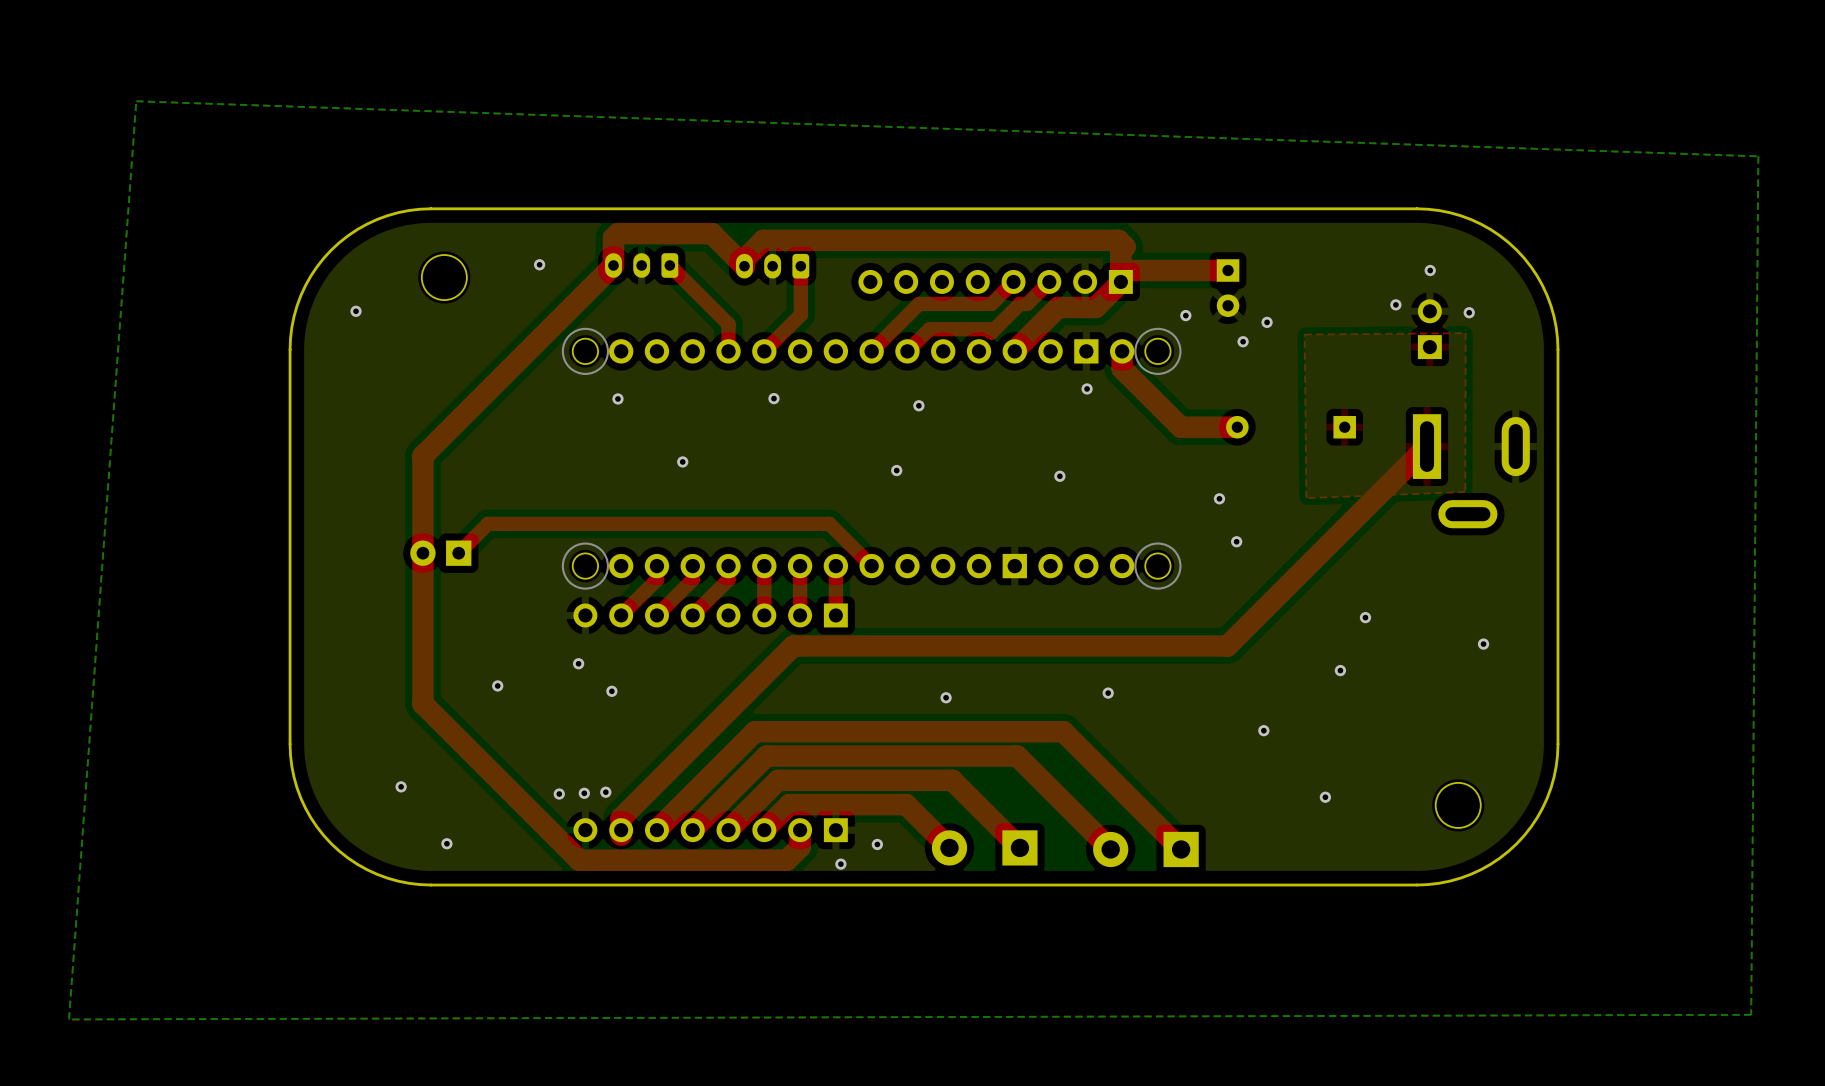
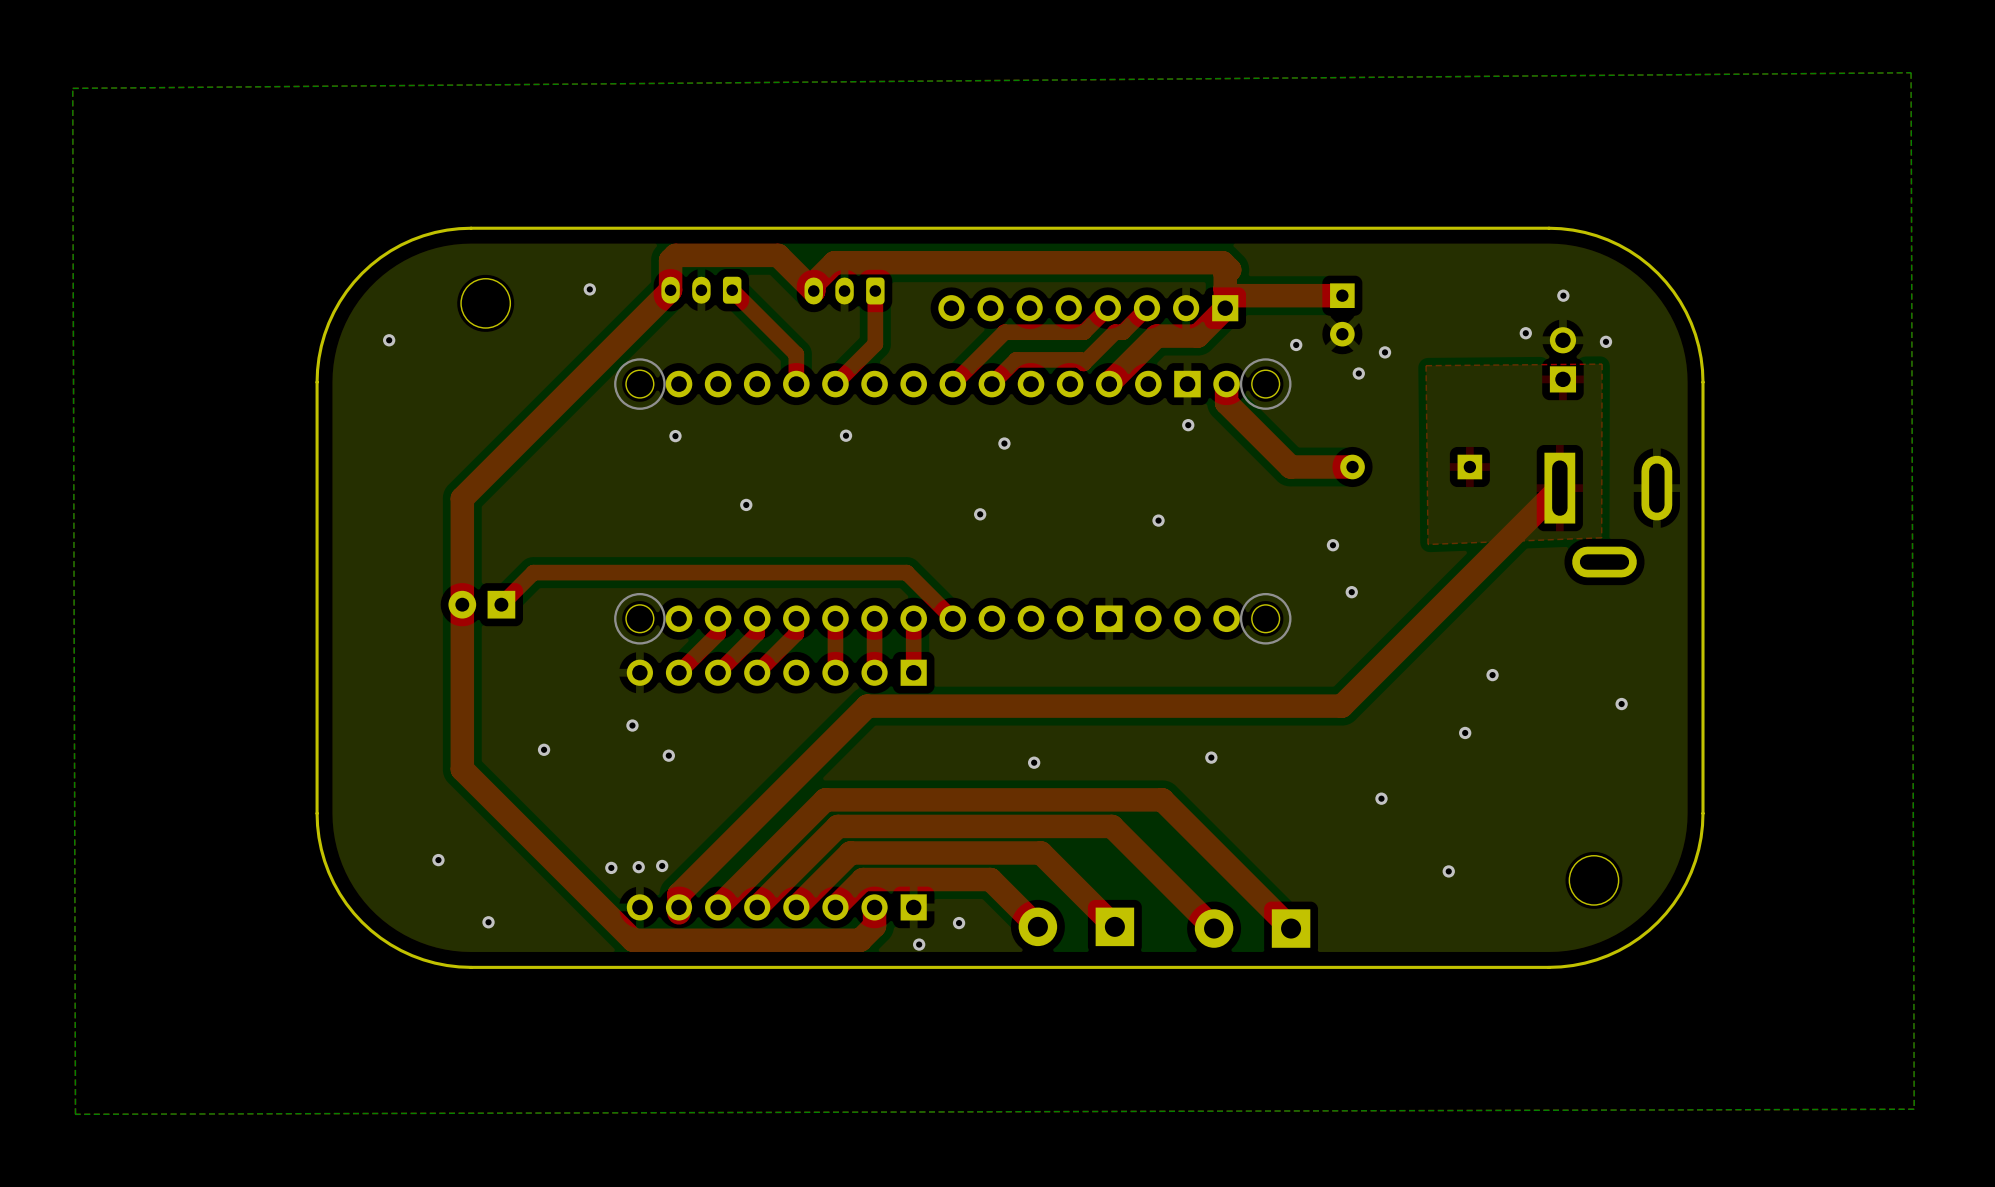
bottom zone outline: (1751, 1014) (1758, 156) (136, 101) (69, 1019) -> (1914, 1109) (1911, 72) (72, 88) (75, 1114)

